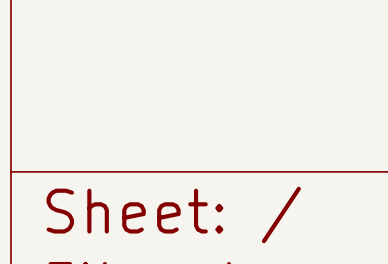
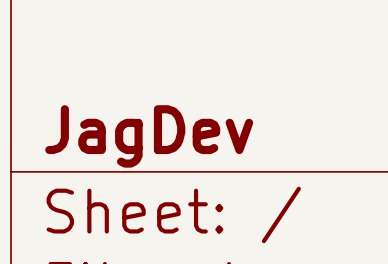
title block: none -> JagDev (149, 136)

